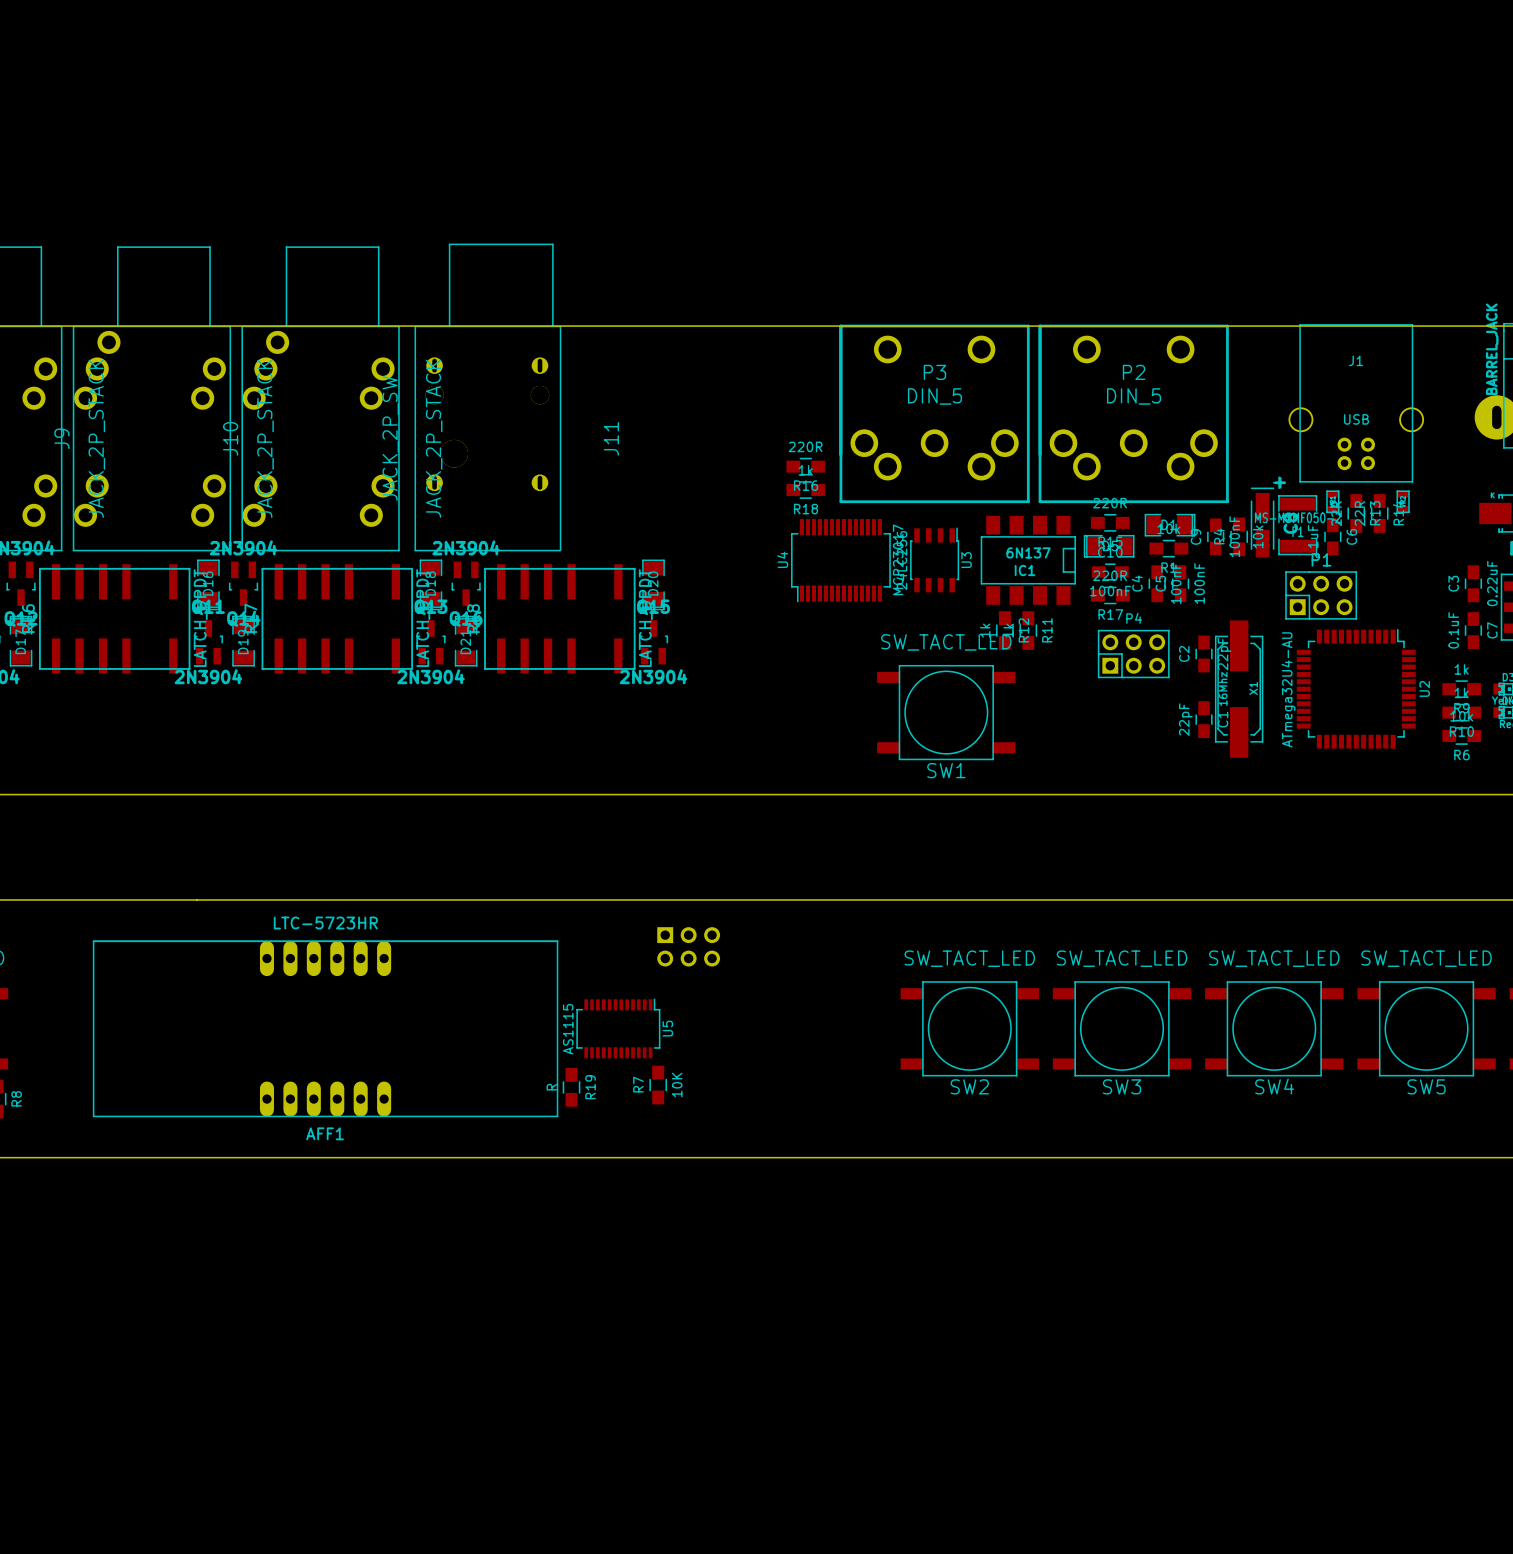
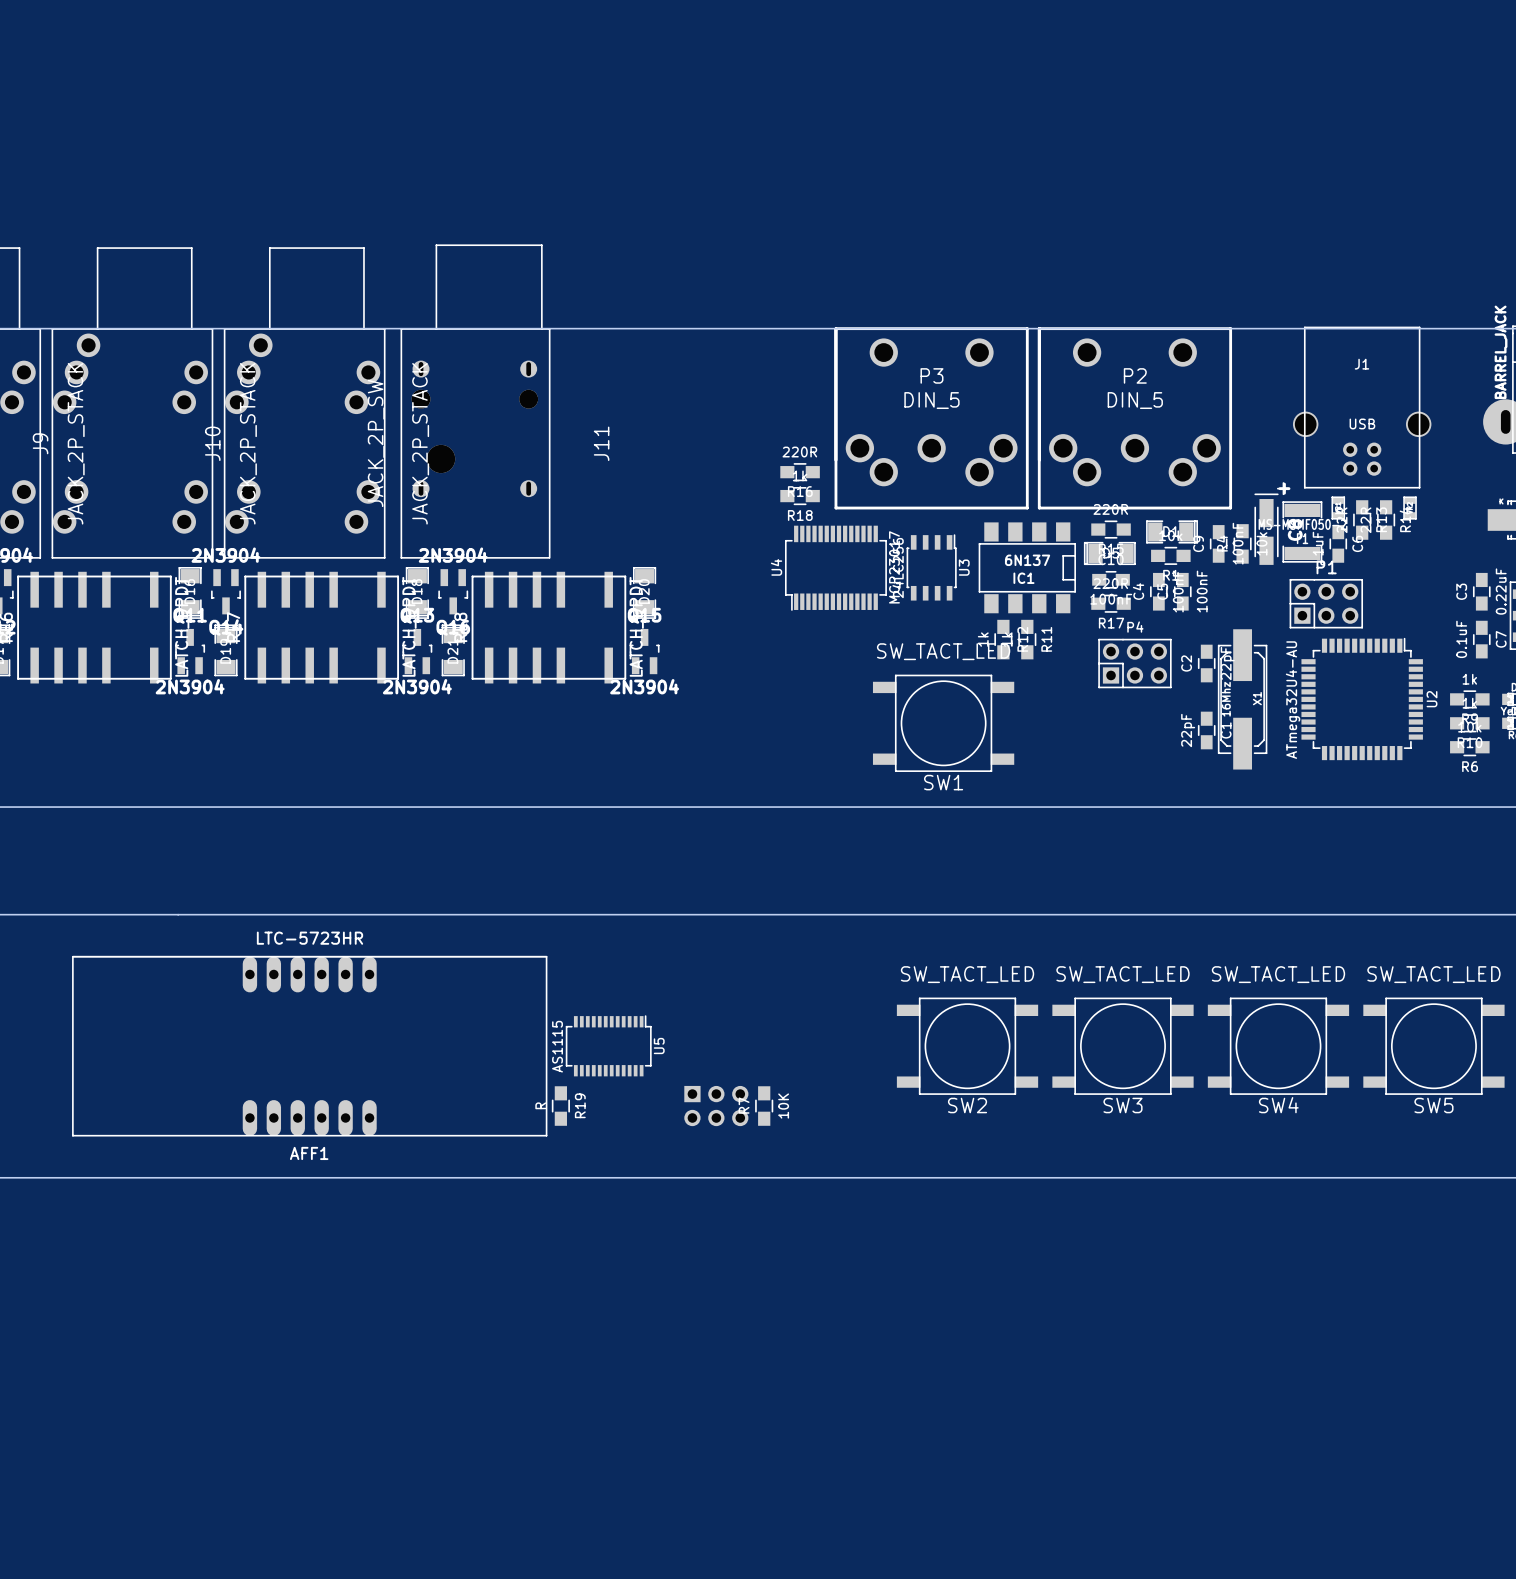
part position: (688, 946) -> (716, 1106)
R7 position: (658, 1085) -> (764, 1106)

